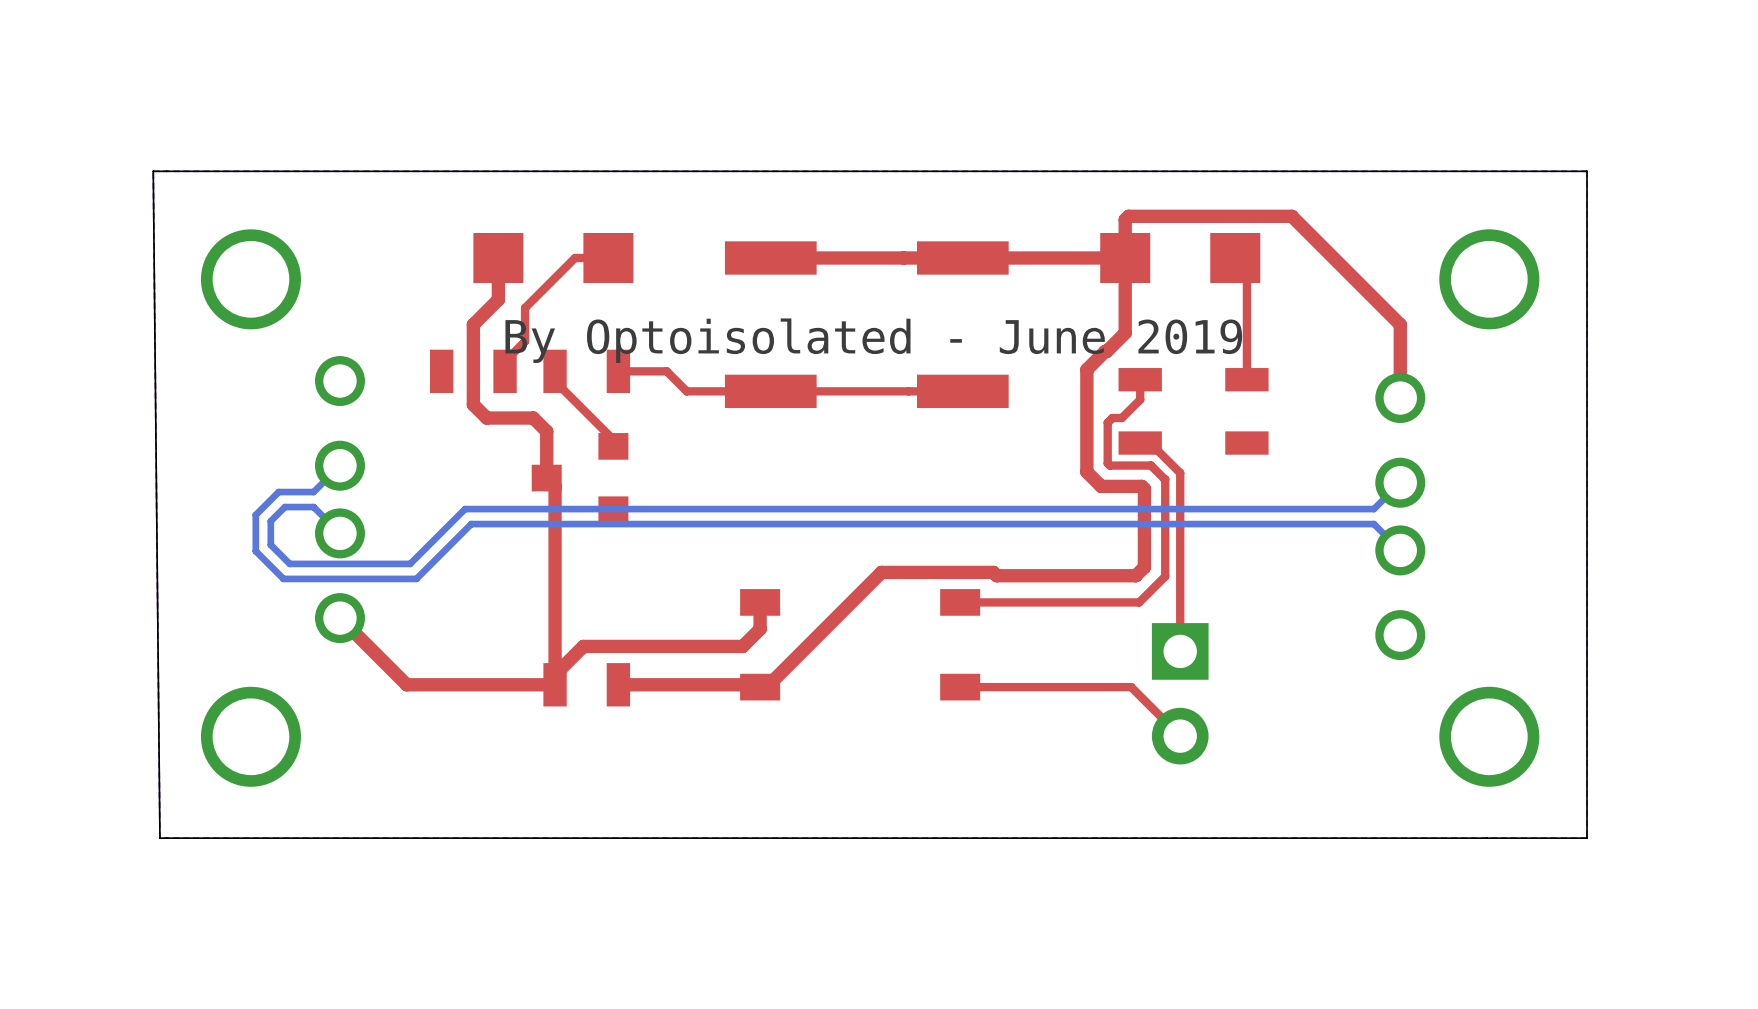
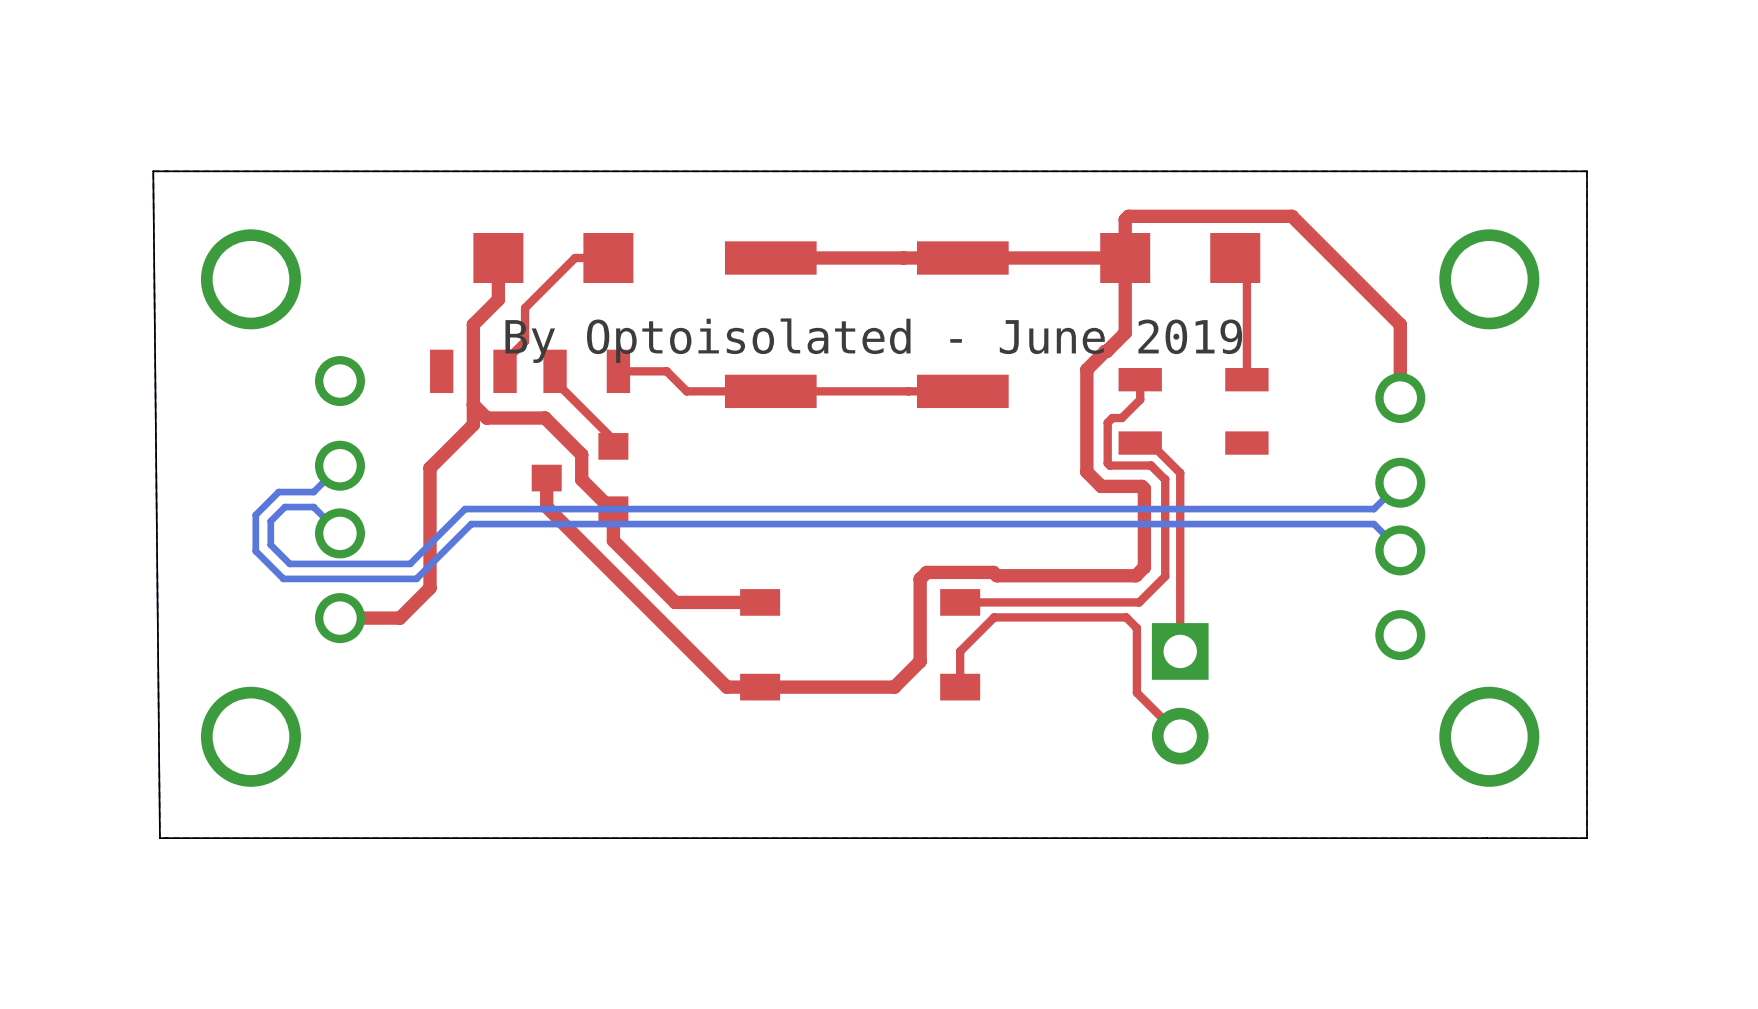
top track: (533, 418) (546, 431) (546, 478) (555, 486) (555, 684) (406, 684) (339, 618) -> (473, 404) (473, 424) (430, 468) (430, 588) (400, 618) (339, 618)
top track: (926, 572) (881, 572) (766, 687) -> (926, 572) (920, 579) (920, 661) (894, 687) (766, 687)
top track: (760, 602) (760, 629) (742, 646) (583, 646) (555, 674) -> (760, 602) (675, 602) (613, 540) (613, 509) (581, 479) (581, 454) (545, 418) (533, 418)
part: (586, 684) -> none
top track: (618, 684) (757, 684) (760, 687) -> (546, 478) (546, 507) (726, 687) (760, 687)
top track: (960, 687) (1131, 687) (1136, 692) -> (960, 687) (960, 651) (994, 617) (1126, 617) (1136, 628) (1136, 692)

